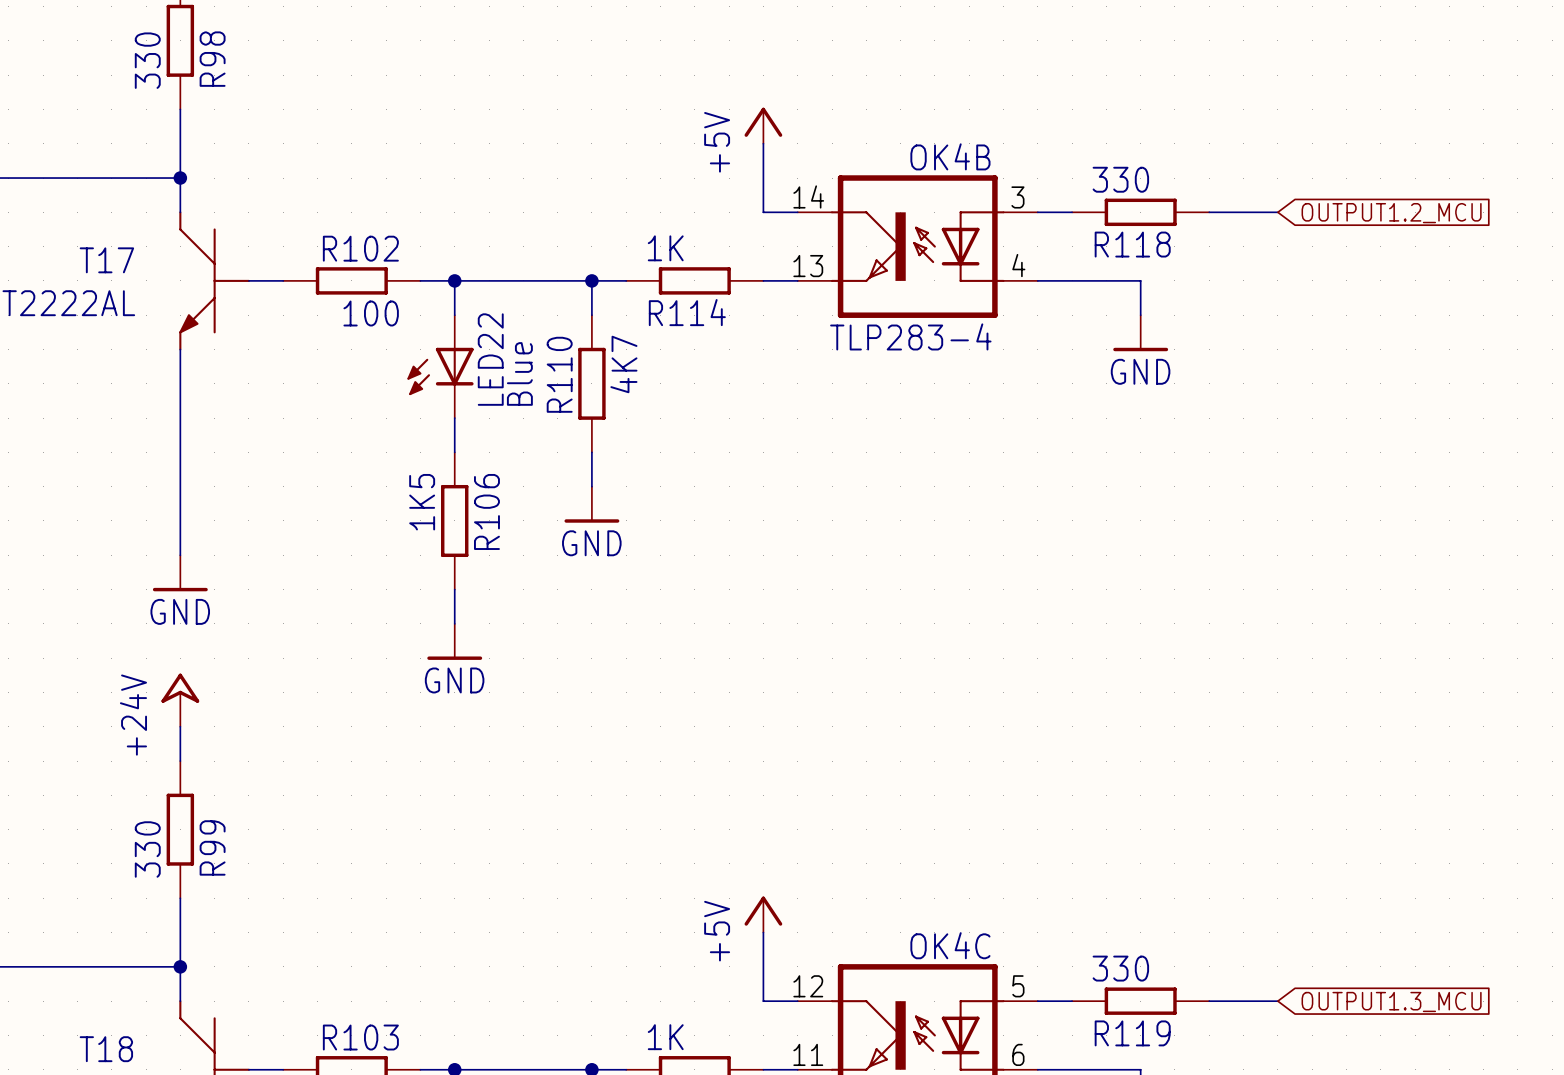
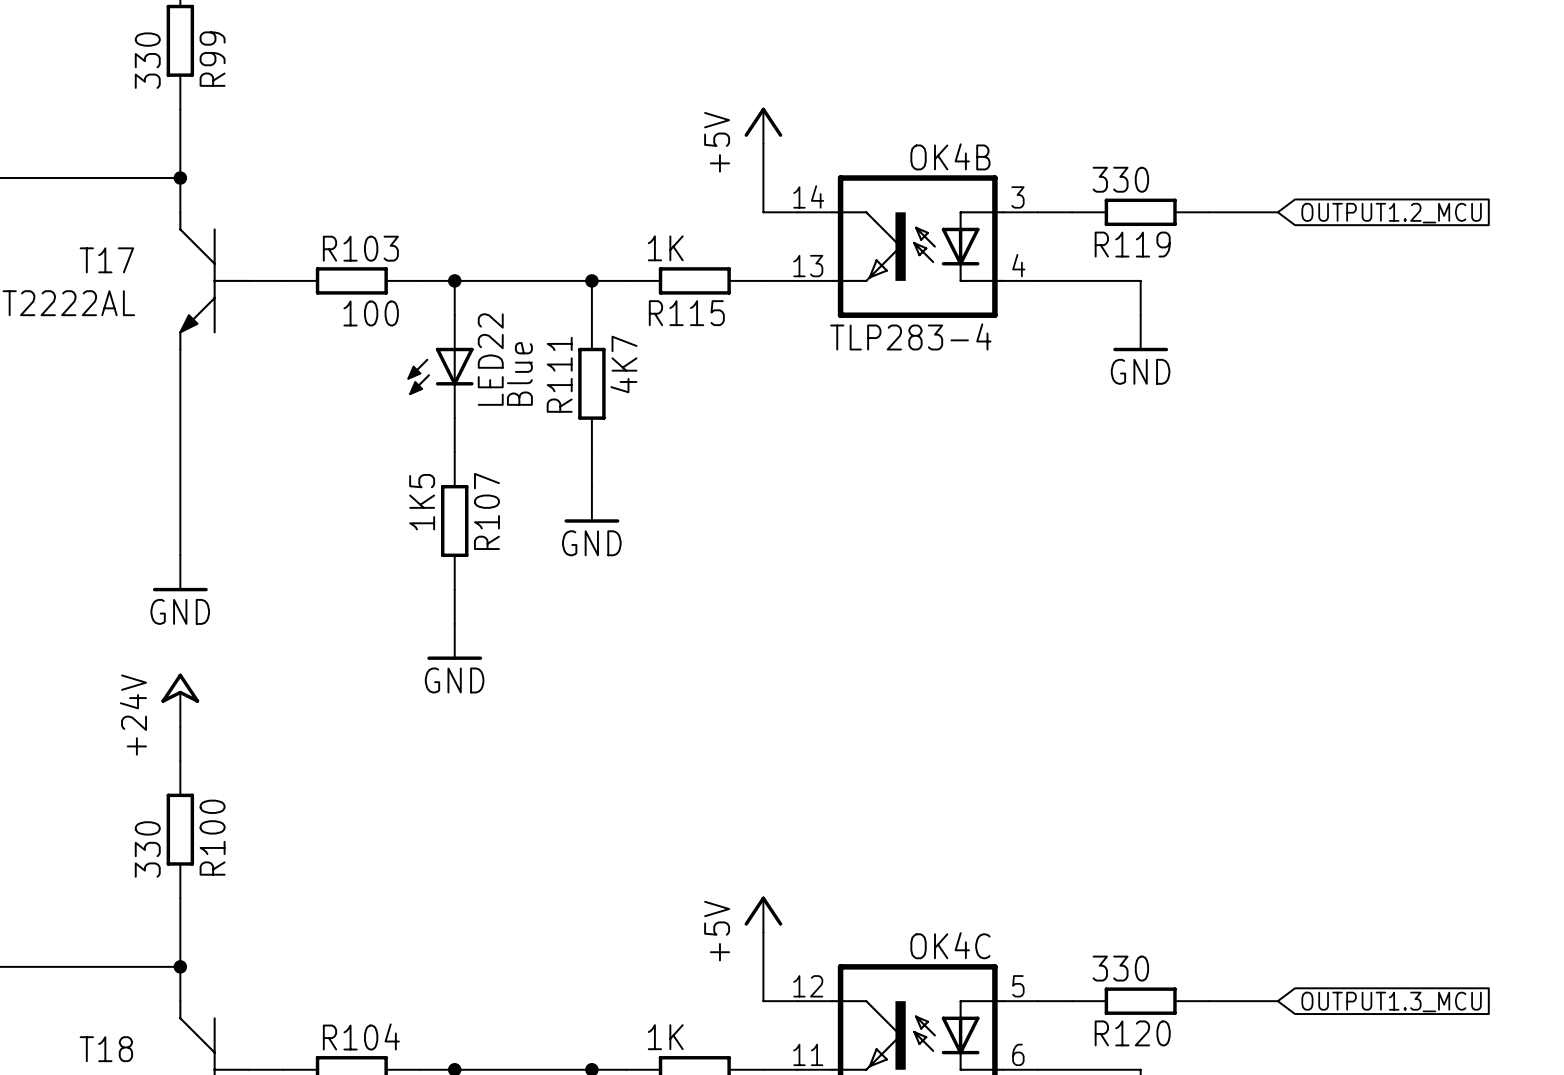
R98 name: R98 (212, 59) -> R99 (212, 59)
R118 name: R118 (1132, 244) -> R119 (1132, 244)
R102 name: R102 (360, 248) -> R103 (360, 248)
R114 name: R114 (687, 312) -> R115 (686, 313)
R110 name: R110 (559, 374) -> R111 (559, 374)
R106 name: R106 (486, 511) -> R107 (486, 511)
R99 name: R99 (212, 847) -> R100 (212, 837)
R119 name: R119 (1132, 1033) -> R120 (1132, 1033)
R103 name: R103 (360, 1037) -> R104 (361, 1036)

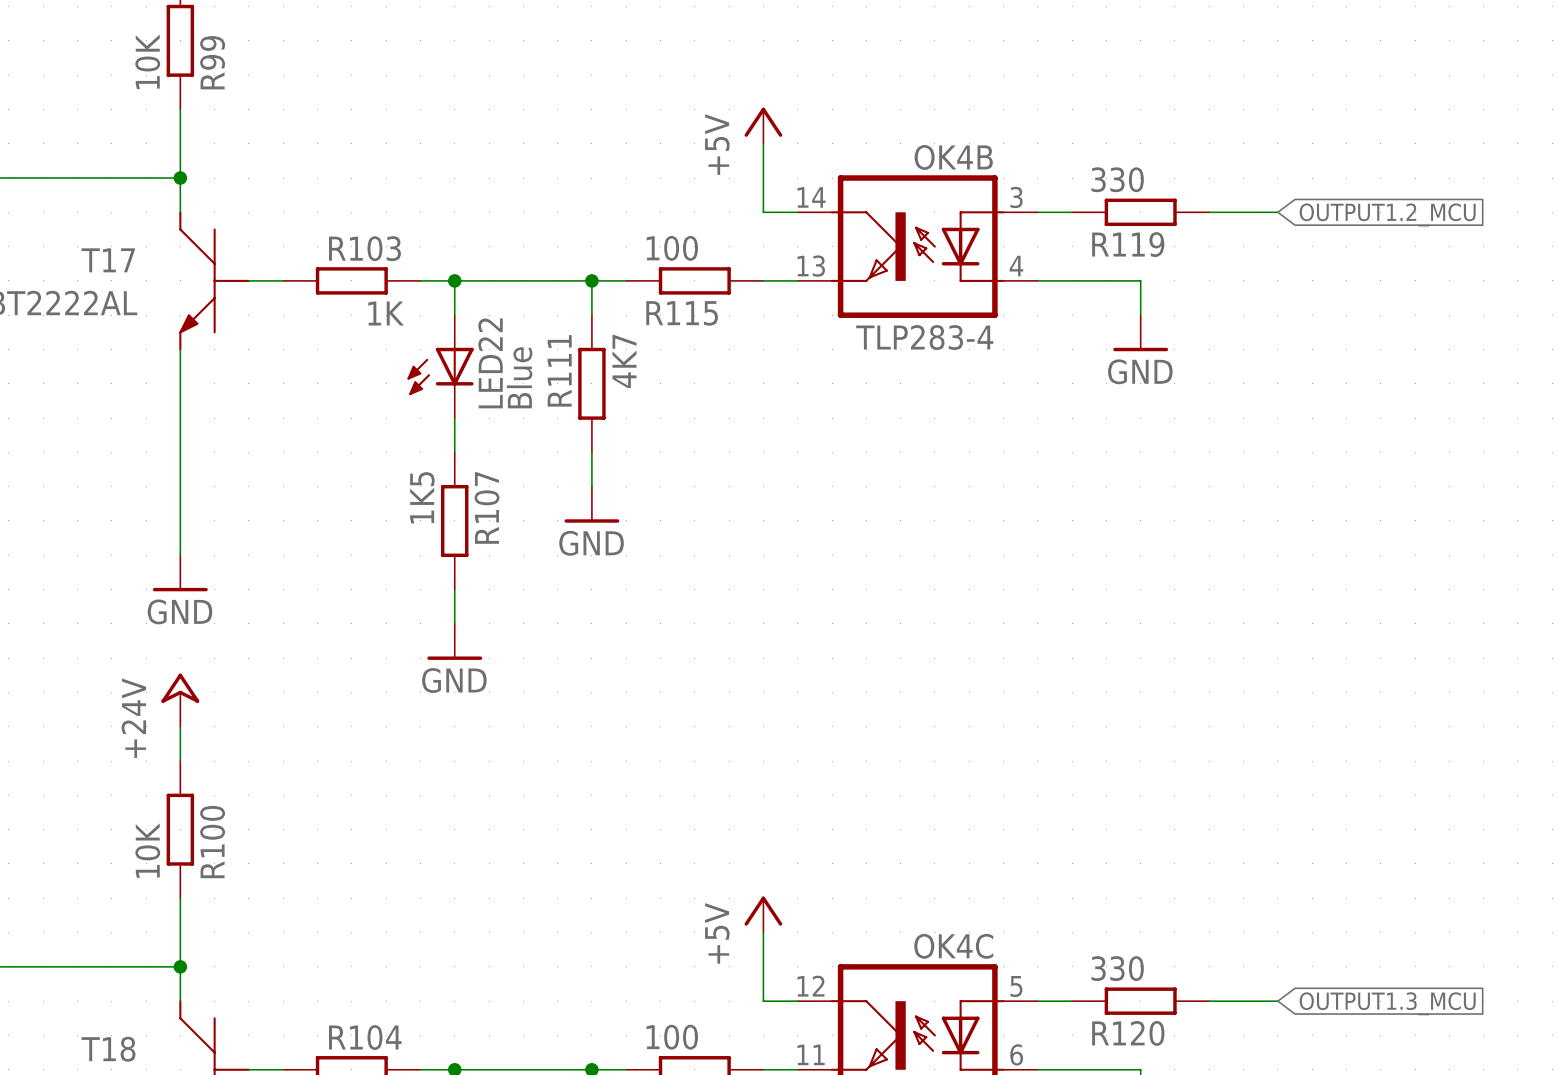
R99 value: 330 (147, 60) -> 10K (147, 61)
R115 value: 1K (665, 248) -> 100 (672, 248)
R103 value: 100 (371, 313) -> 1K (386, 313)
R100 value: 330 (147, 849) -> 10K (147, 850)
part value: 1K (665, 1037) -> 100 (672, 1037)

